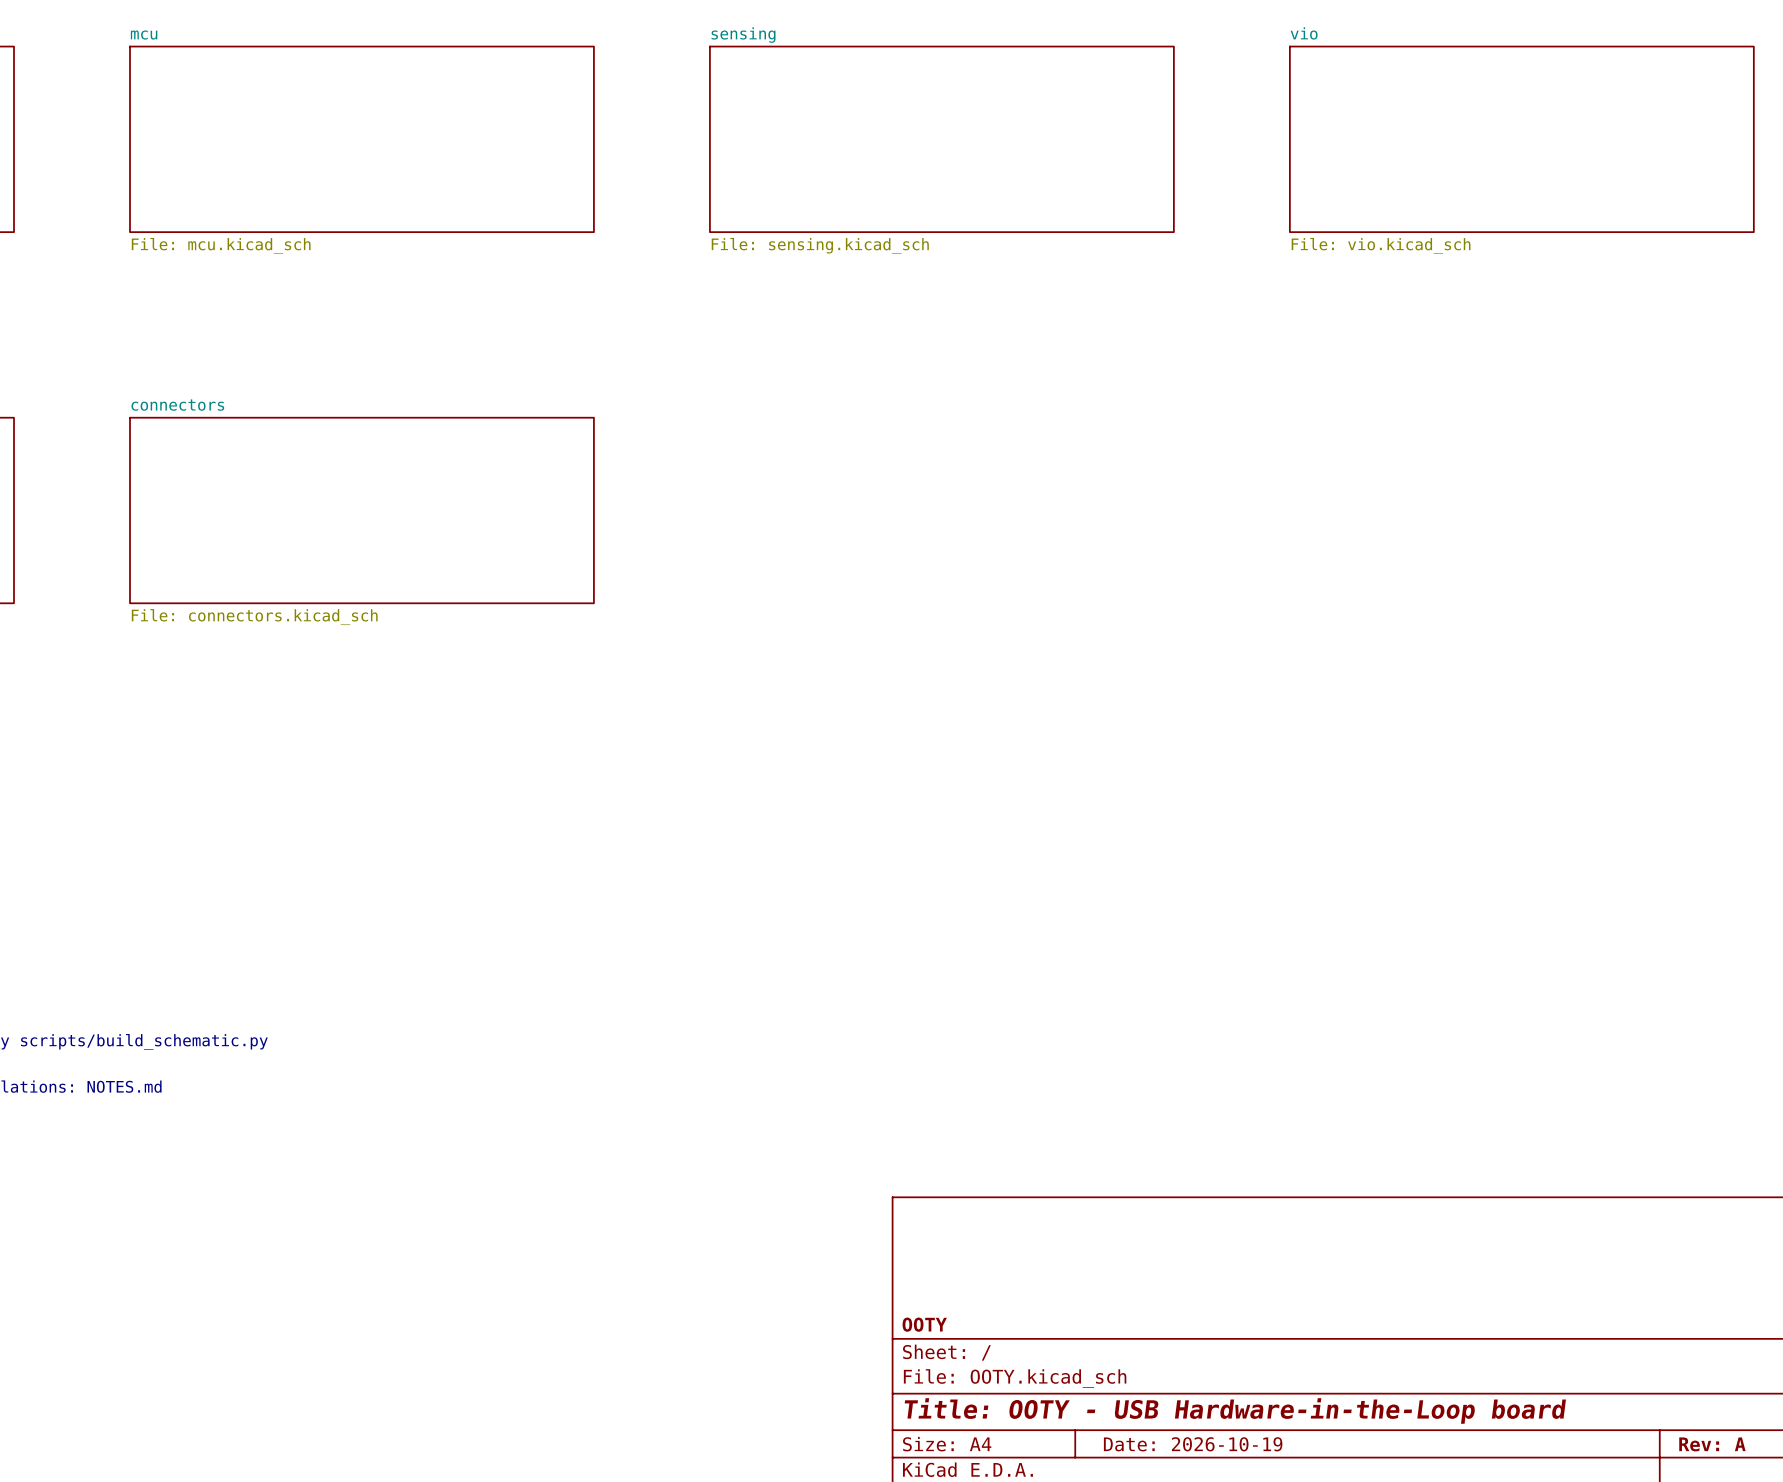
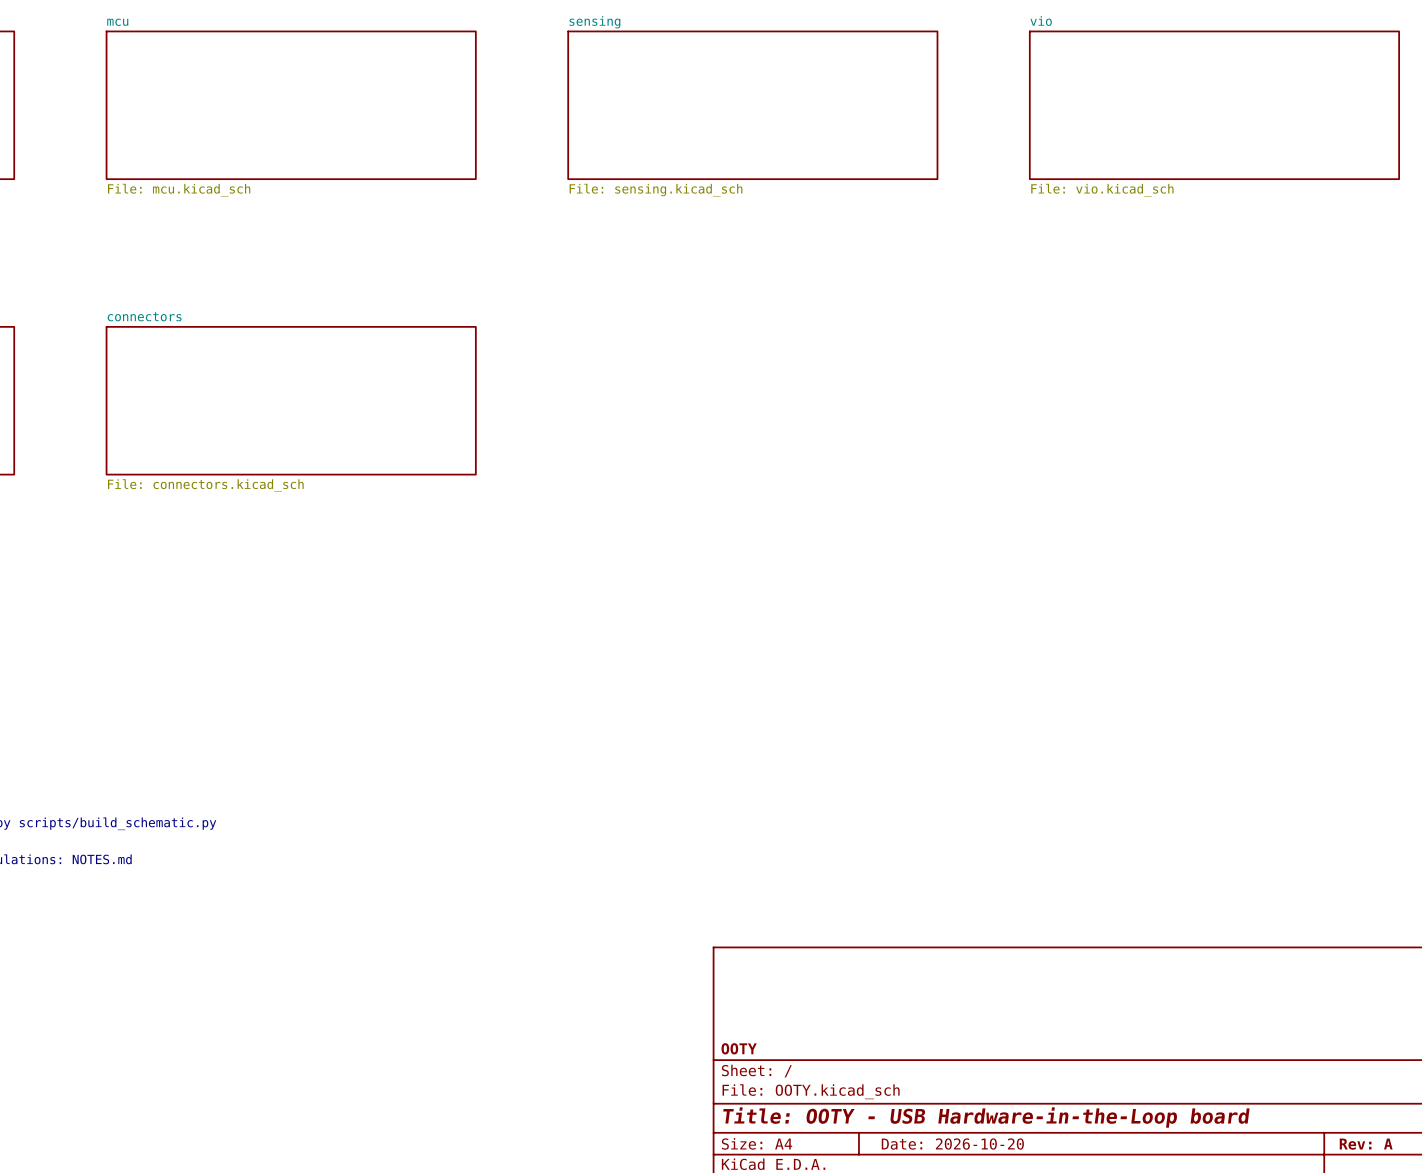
title block: Date: 2026-10-19 (1193, 1444) -> Date: 2026-10-20 (952, 1144)

